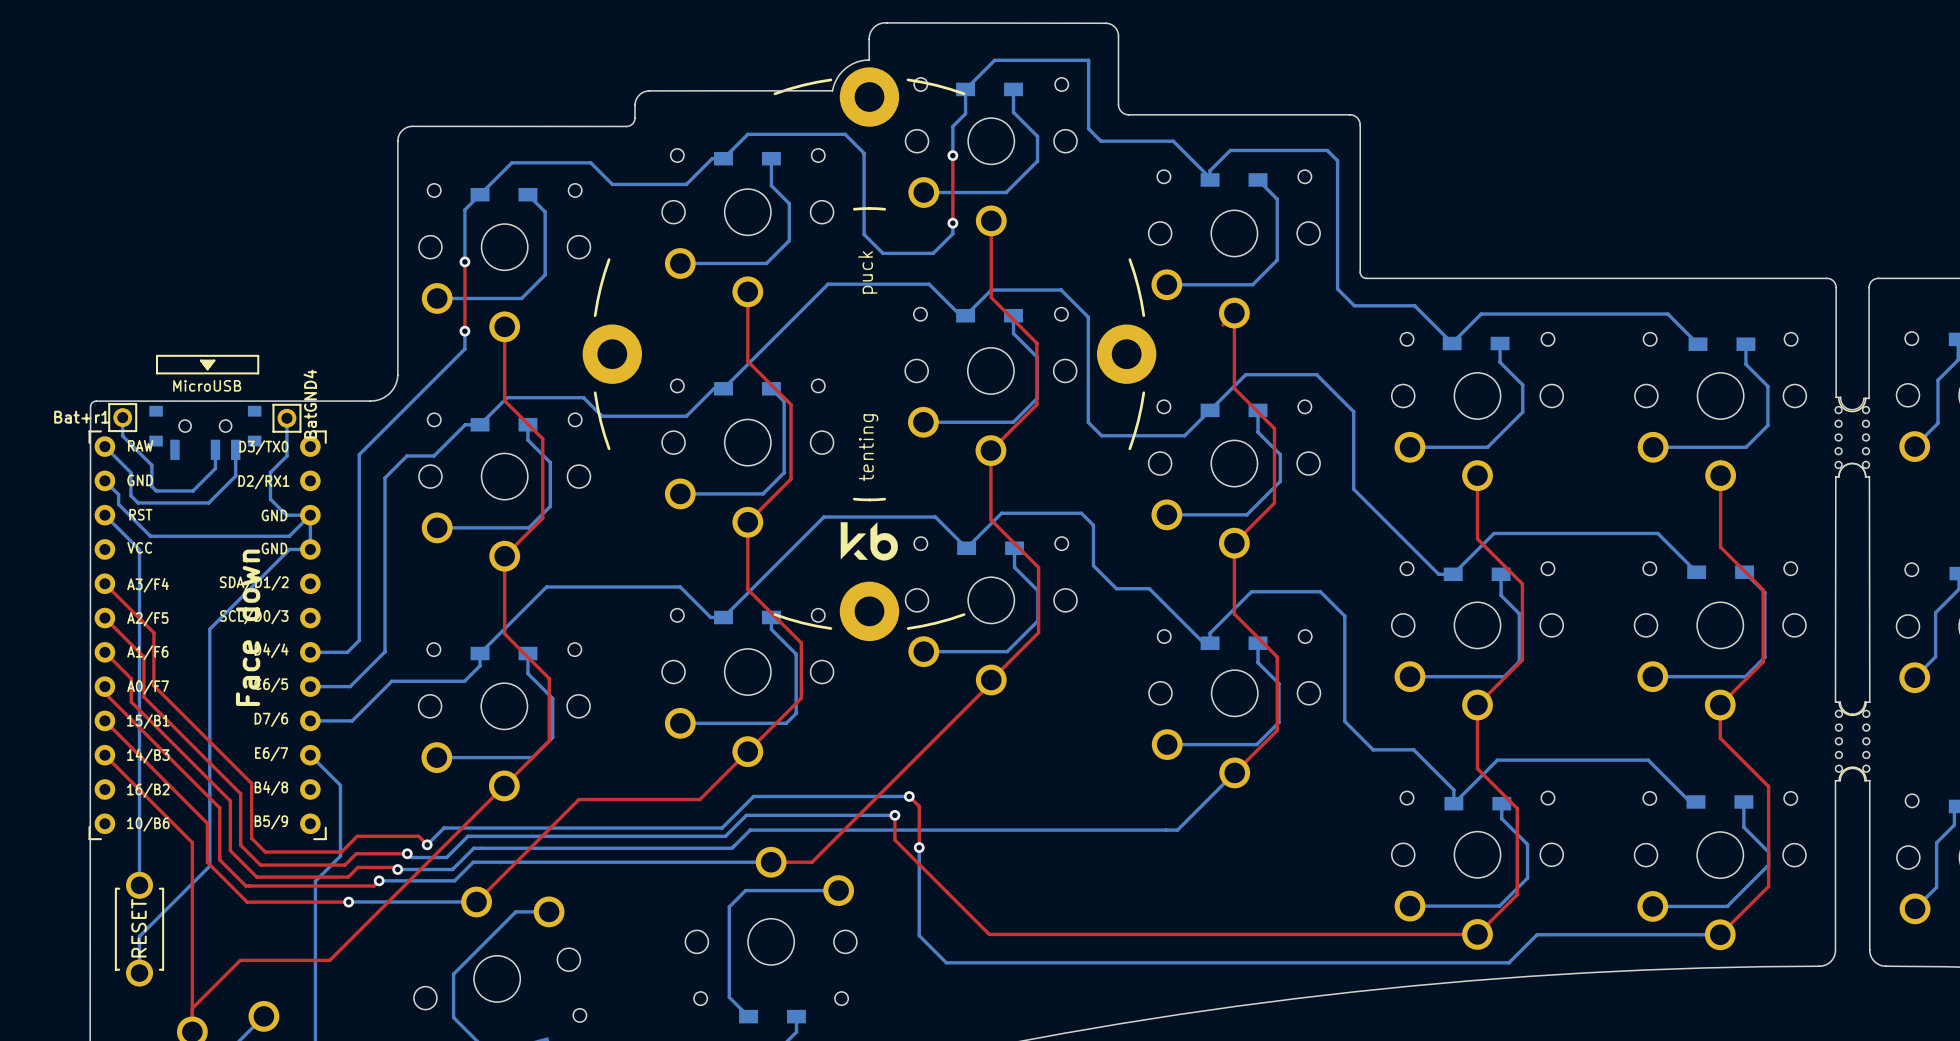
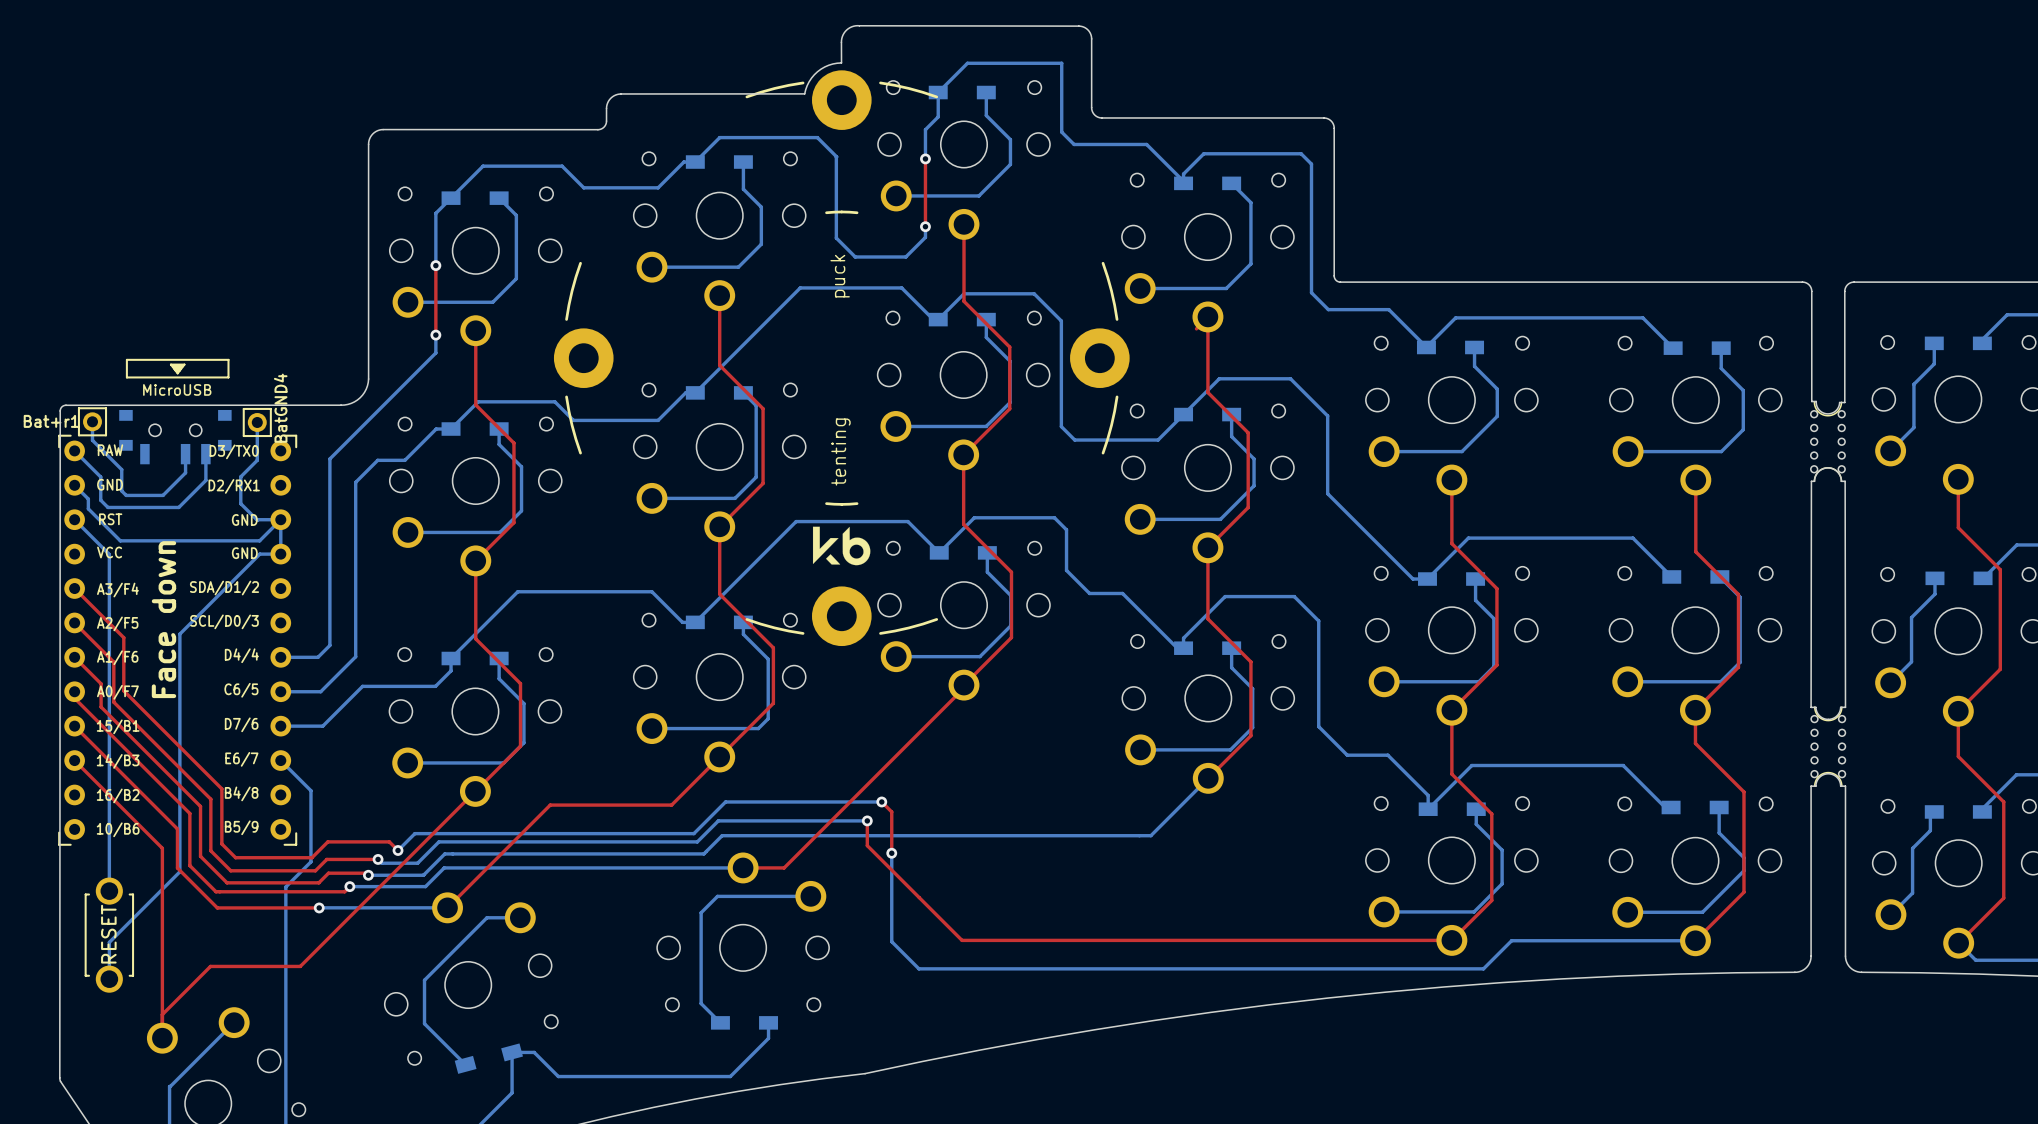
text position: Face down (248, 627) -> Face down (163, 619)

